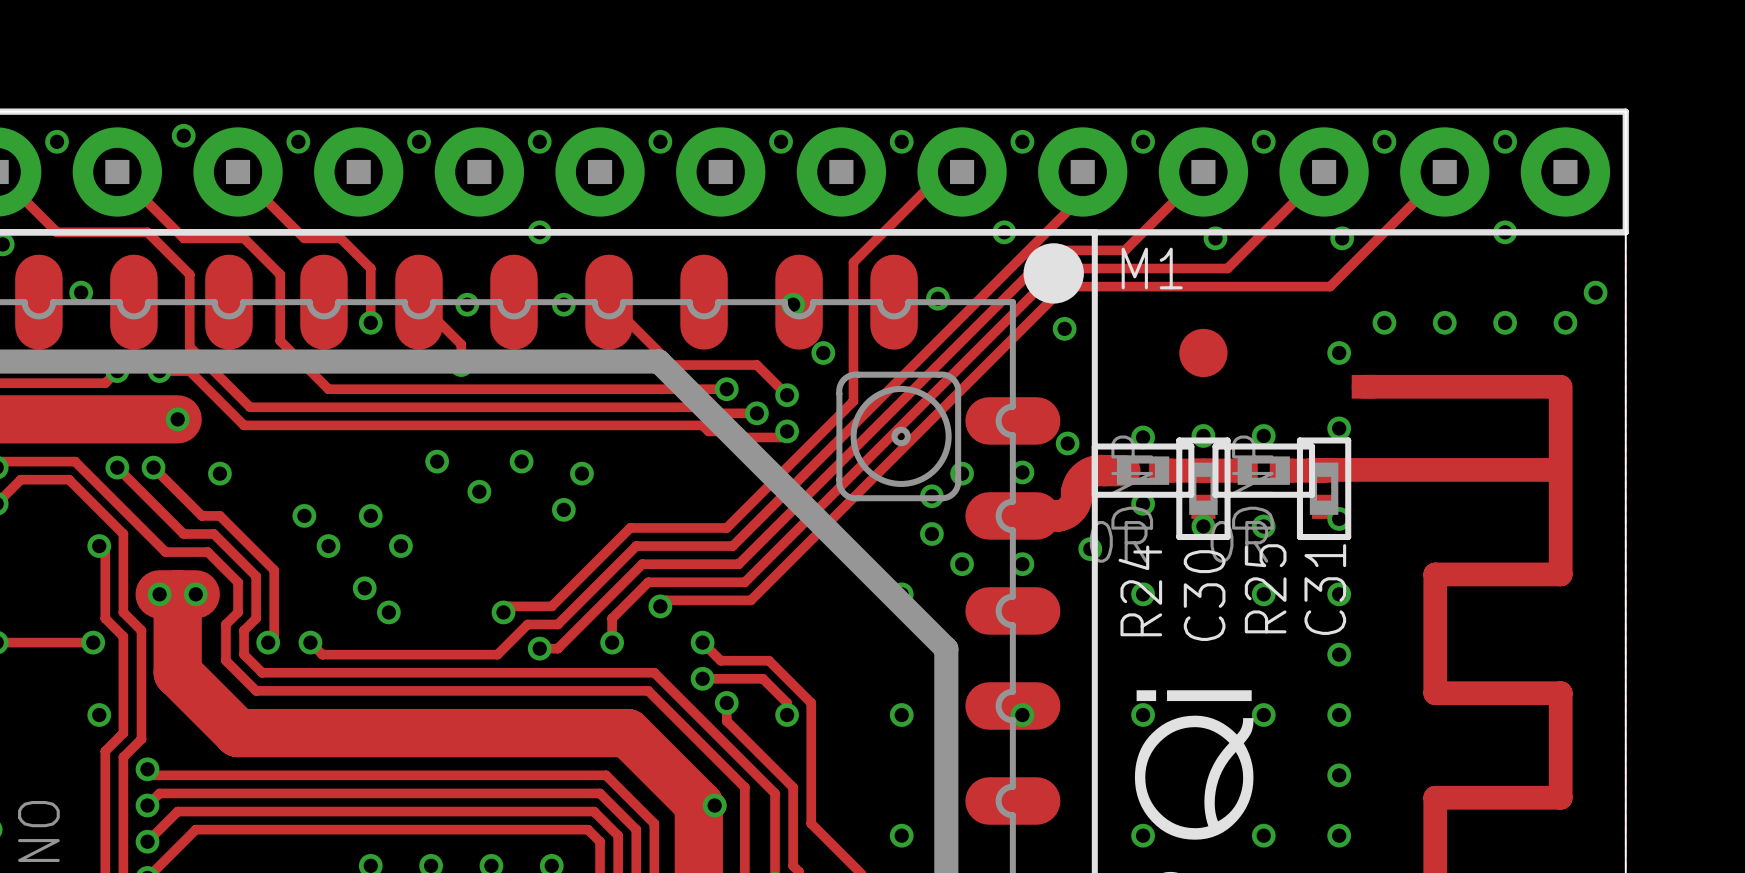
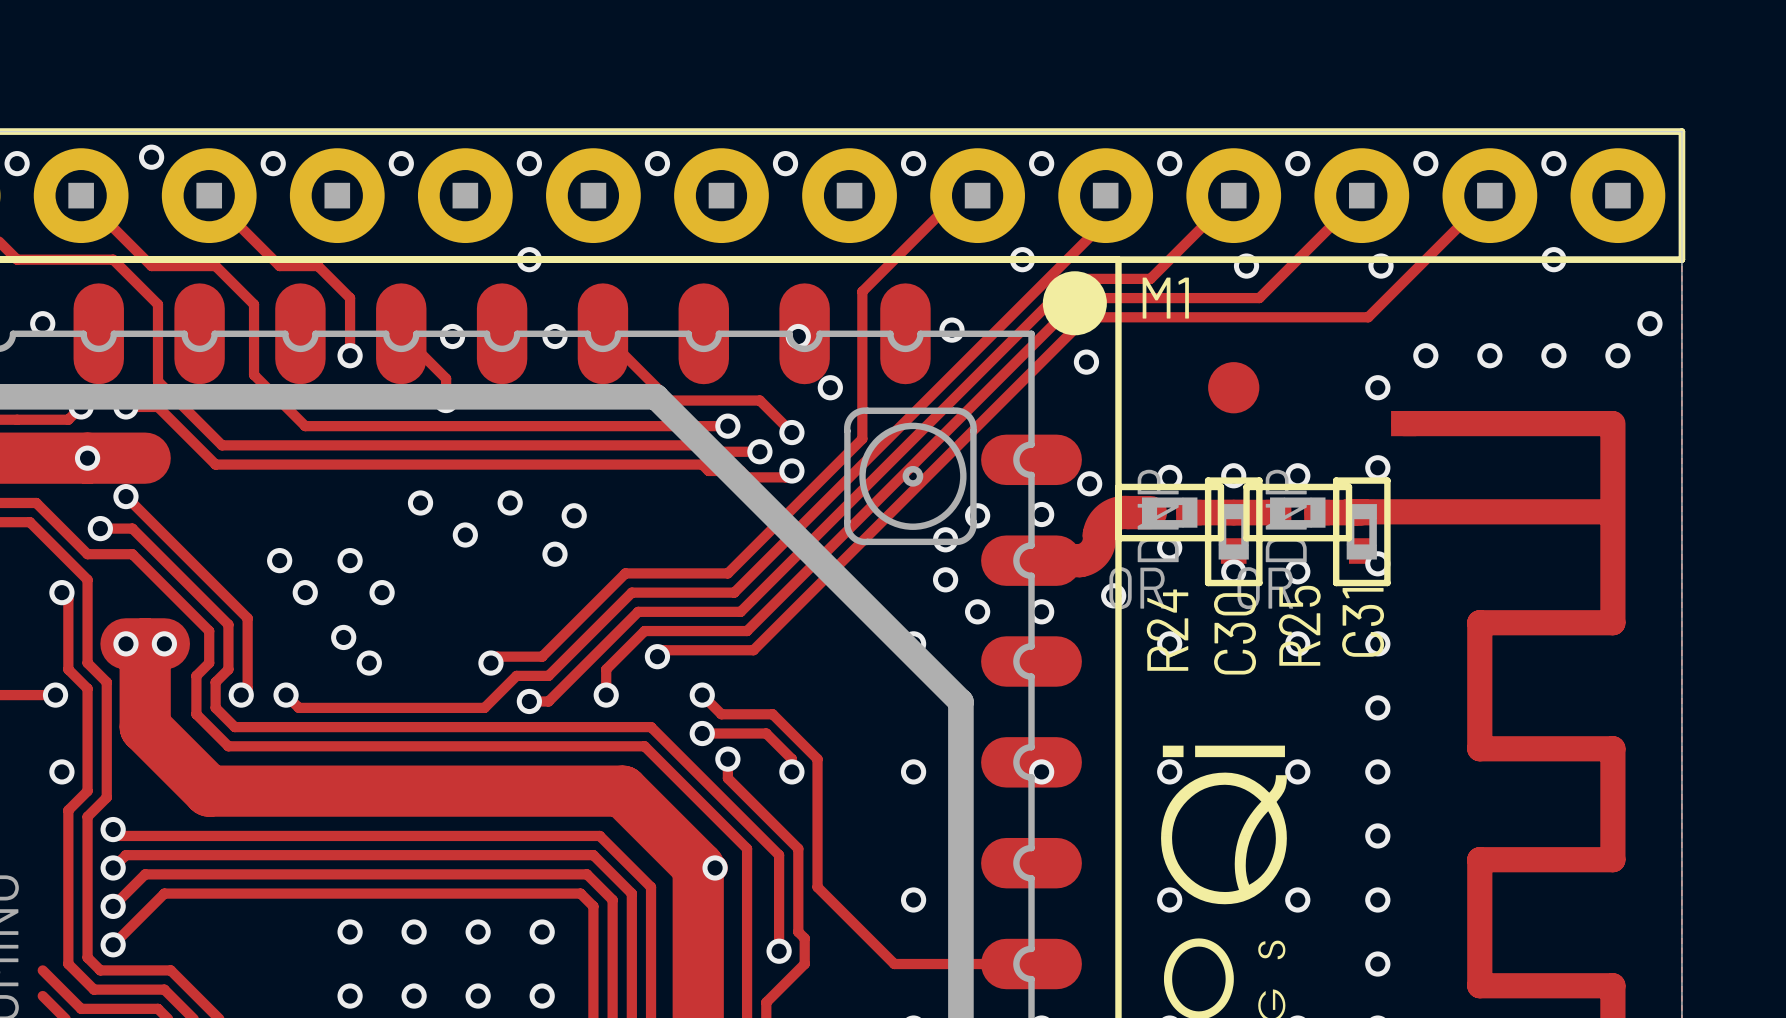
via: none -> (87, 458)
via: (177, 419) -> none
via: none -> (125, 496)
track: (117, 467) (183, 534) (213, 534) -> (100, 528) (132, 528) (183, 579)
via: (117, 467) -> none
track: (153, 467) (201, 515) (219, 515) -> (125, 496) (190, 560)
via: (153, 467) -> none
via: (219, 473) -> none
via: none -> (100, 528)
track: (123, 509) (165, 552) (207, 552) -> (87, 554) (132, 554) (177, 599)

